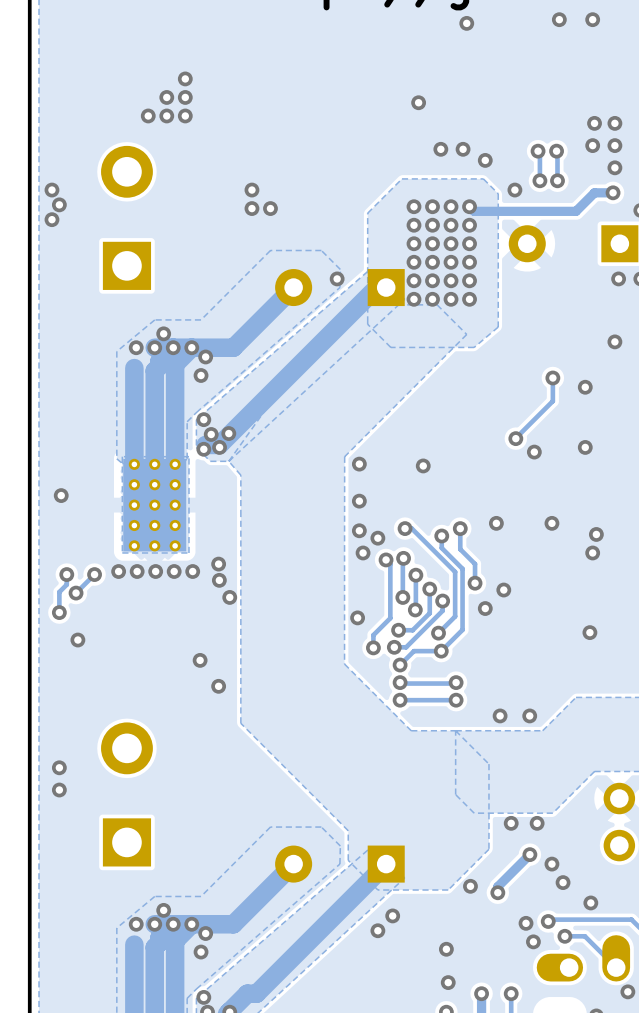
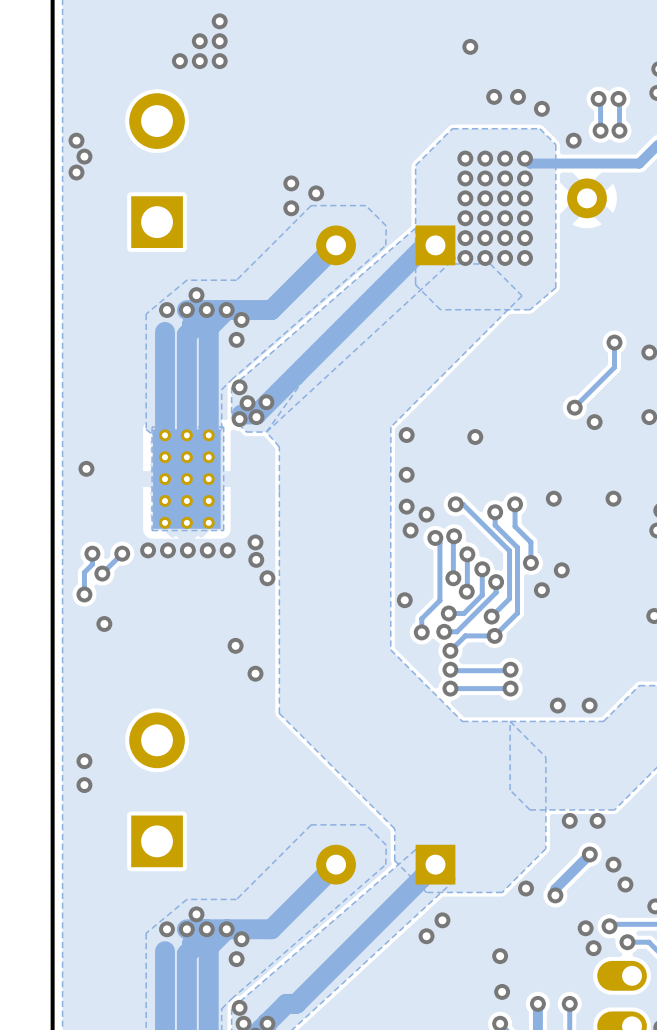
via: (251, 190) -> none
via: (251, 208) -> none
via: (270, 208) -> none
via: none -> (291, 183)
via: none -> (316, 193)
via: none -> (291, 208)
via: (337, 278) -> none

